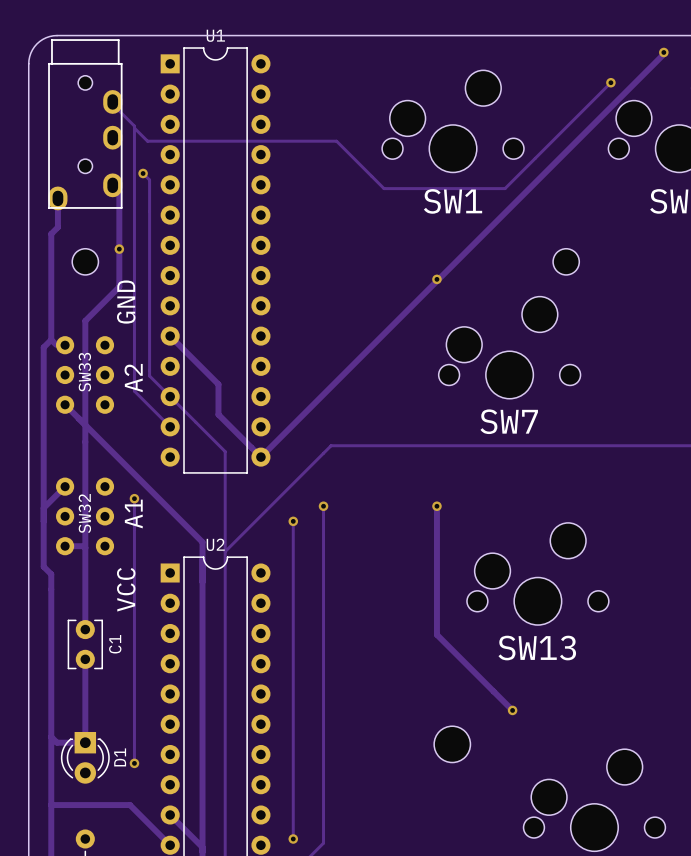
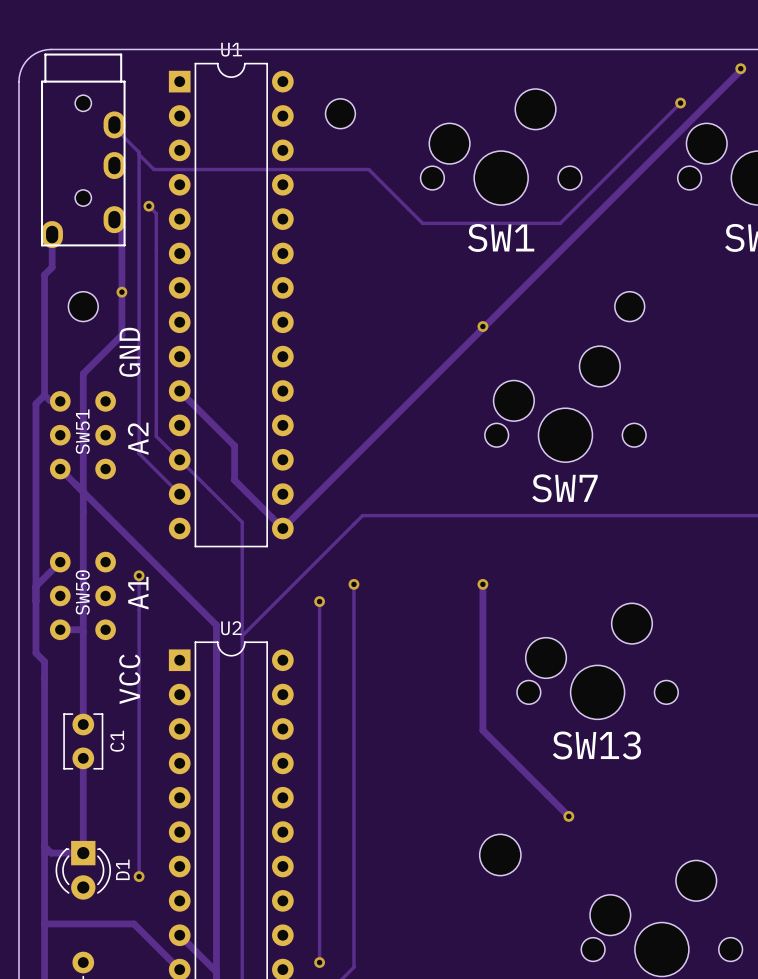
part: none -> (340, 113)
SW33 name: SW33 (84, 372) -> SW51 (82, 431)
SW32 name: SW32 (84, 513) -> SW50 (82, 592)

